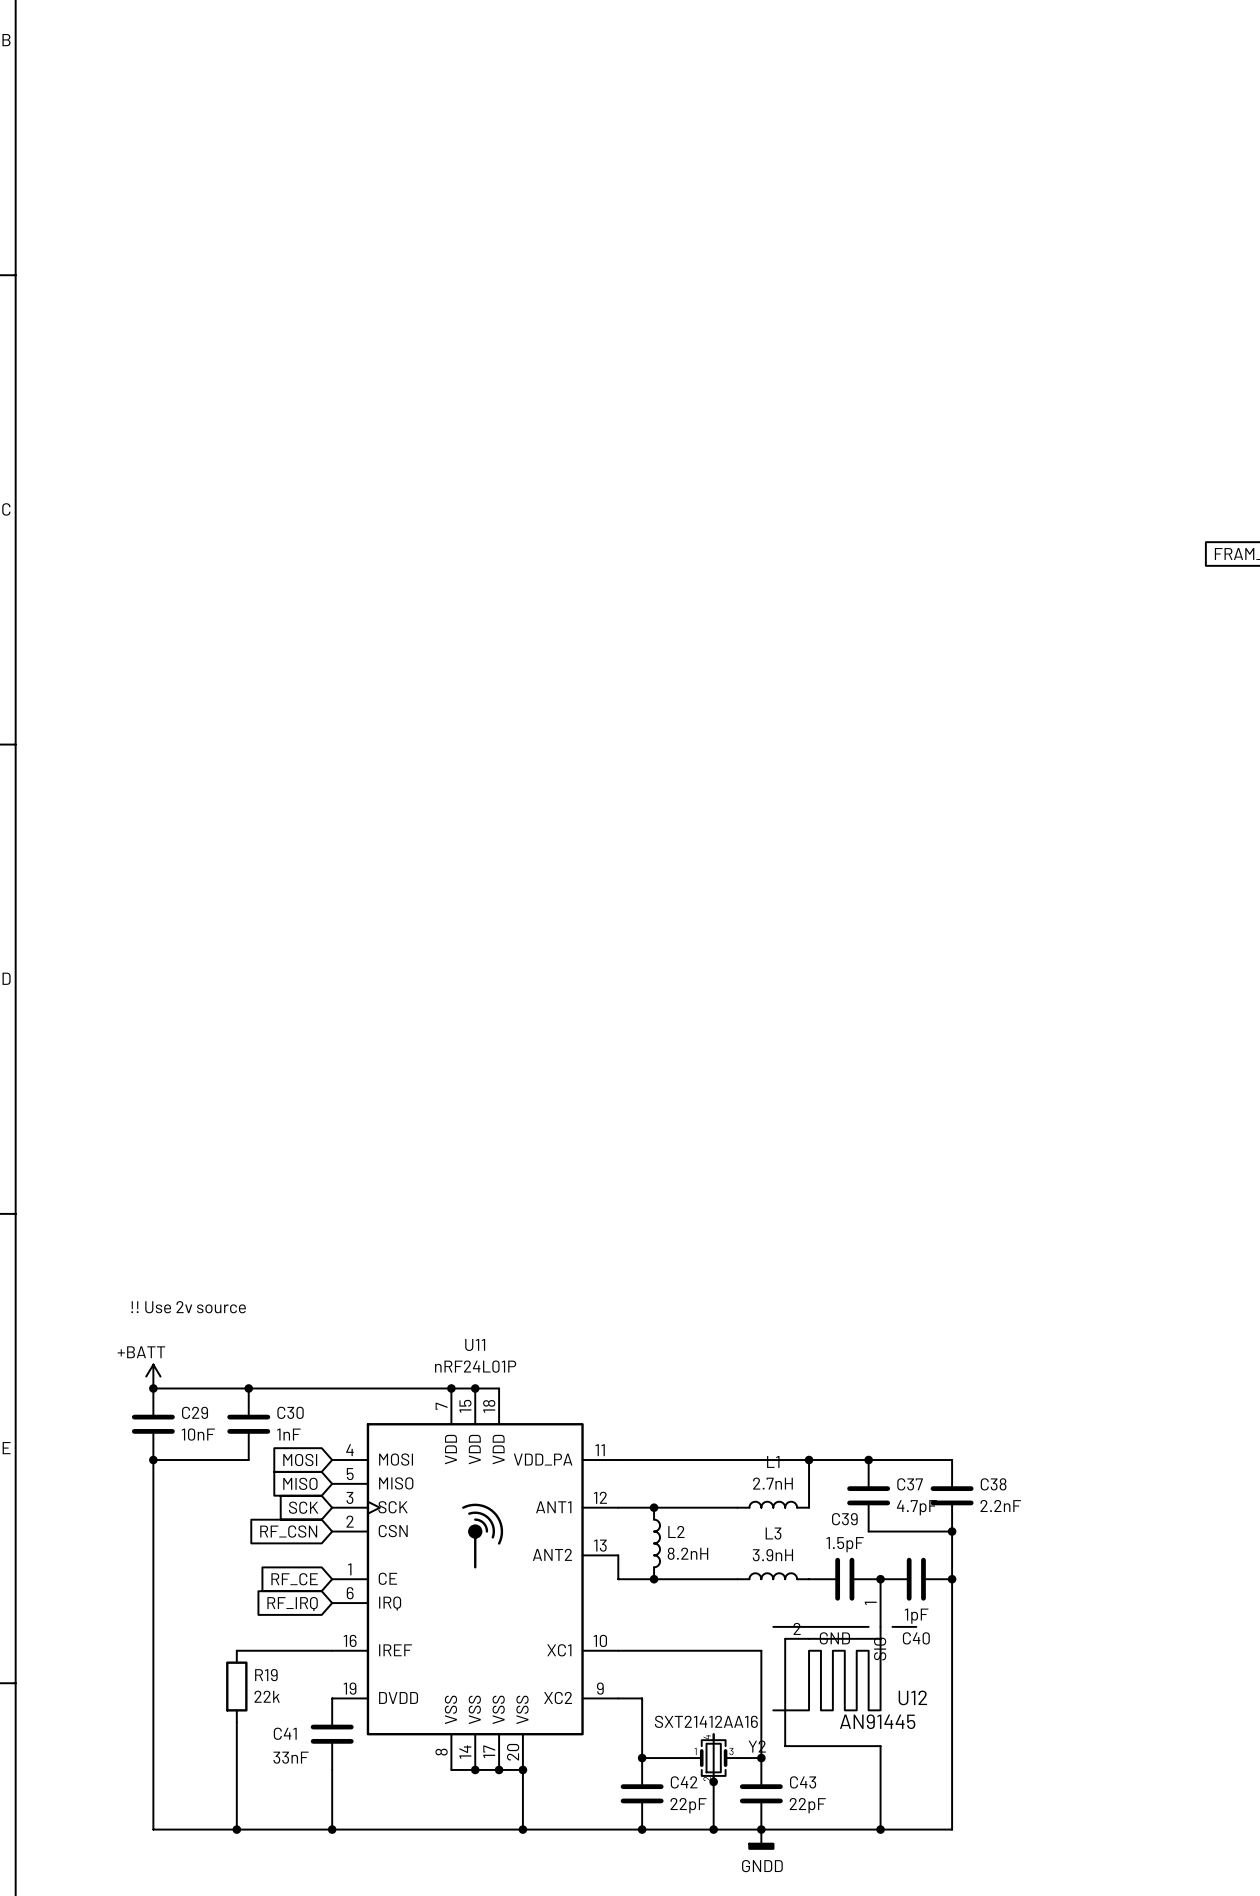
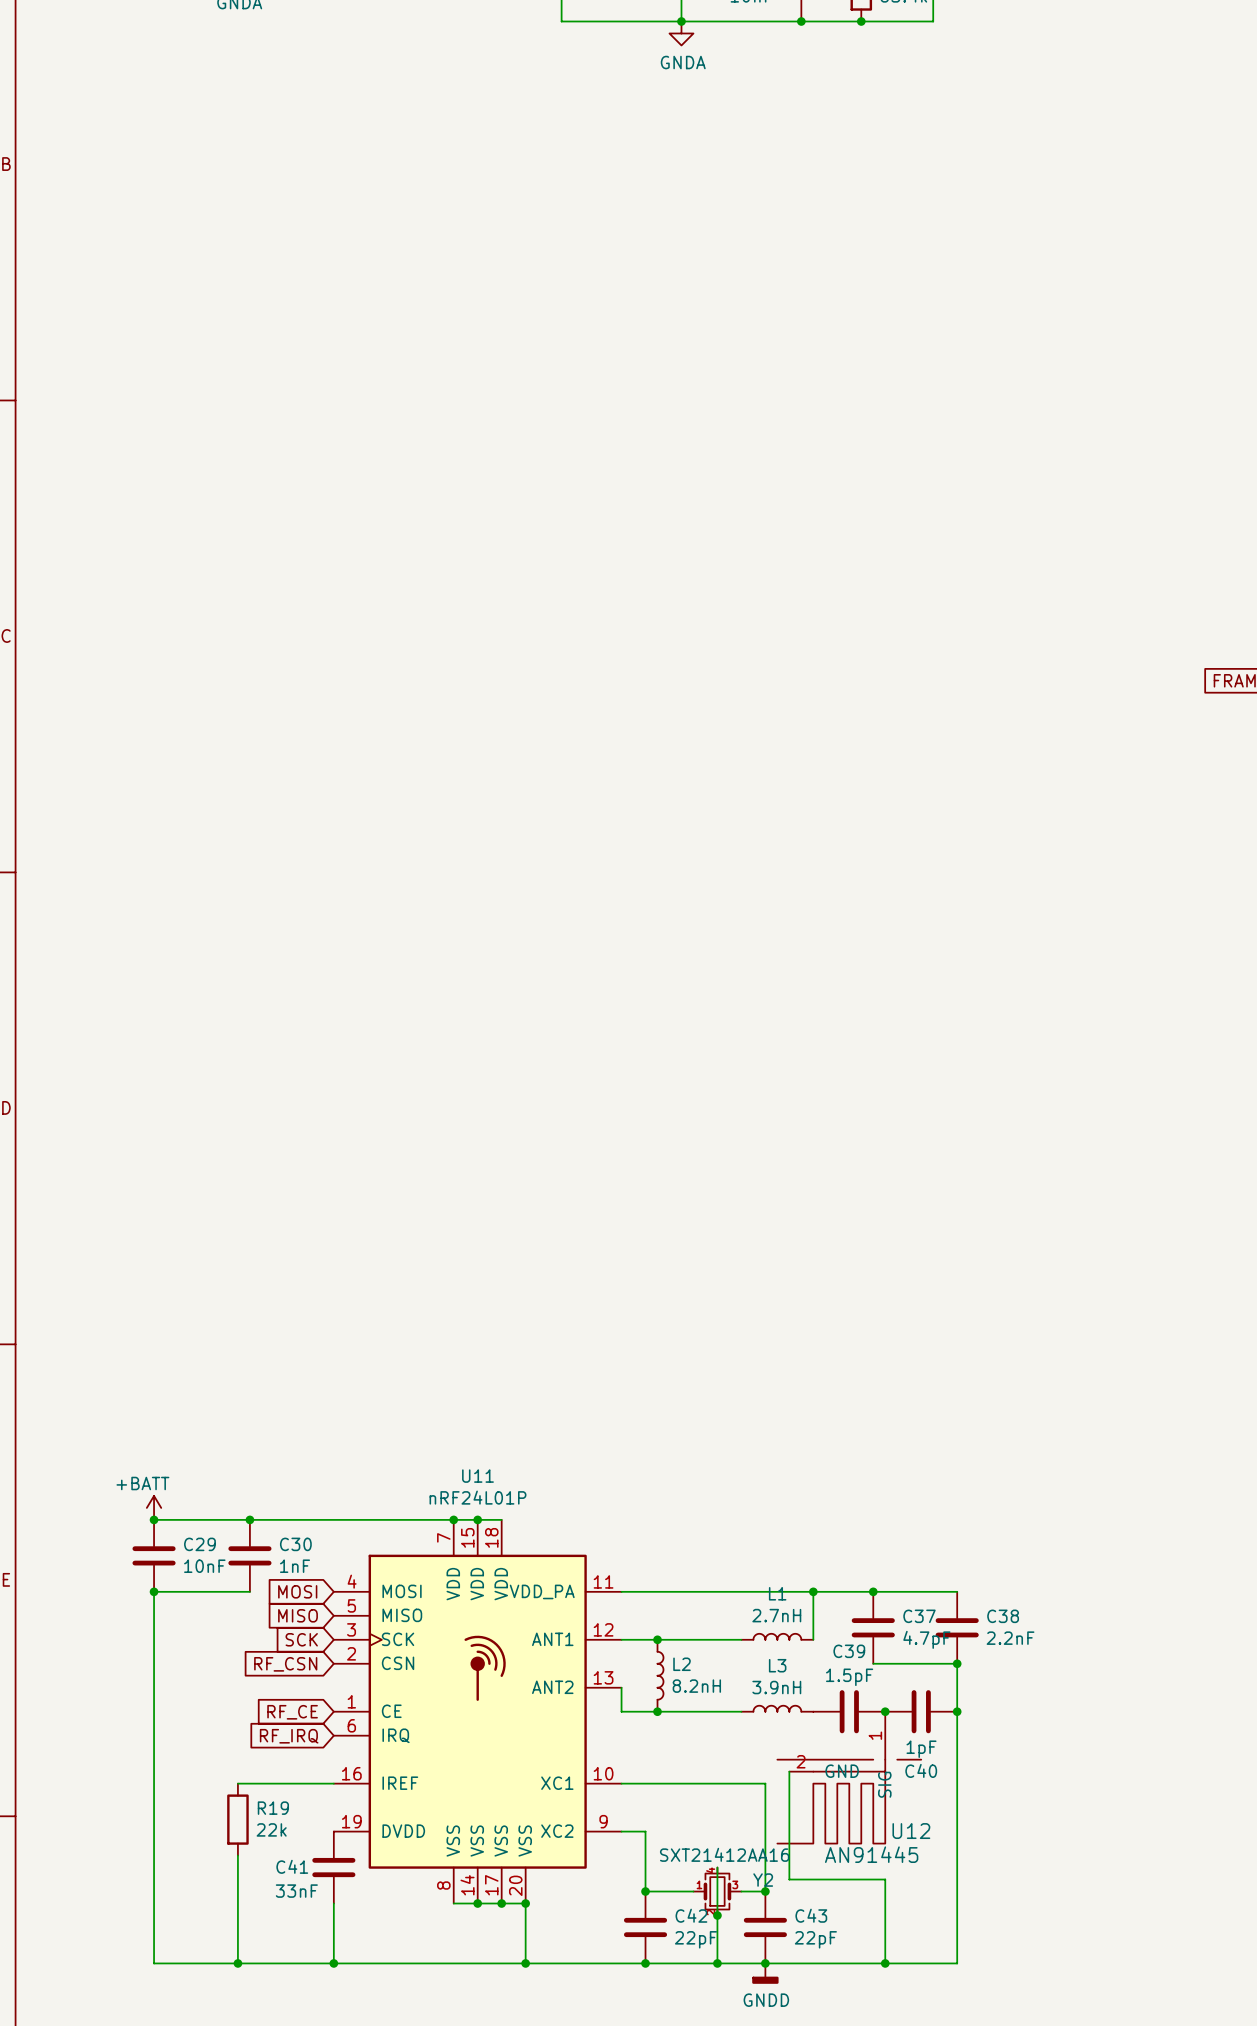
text: !! Use 2v source (188, 1307) -> none

